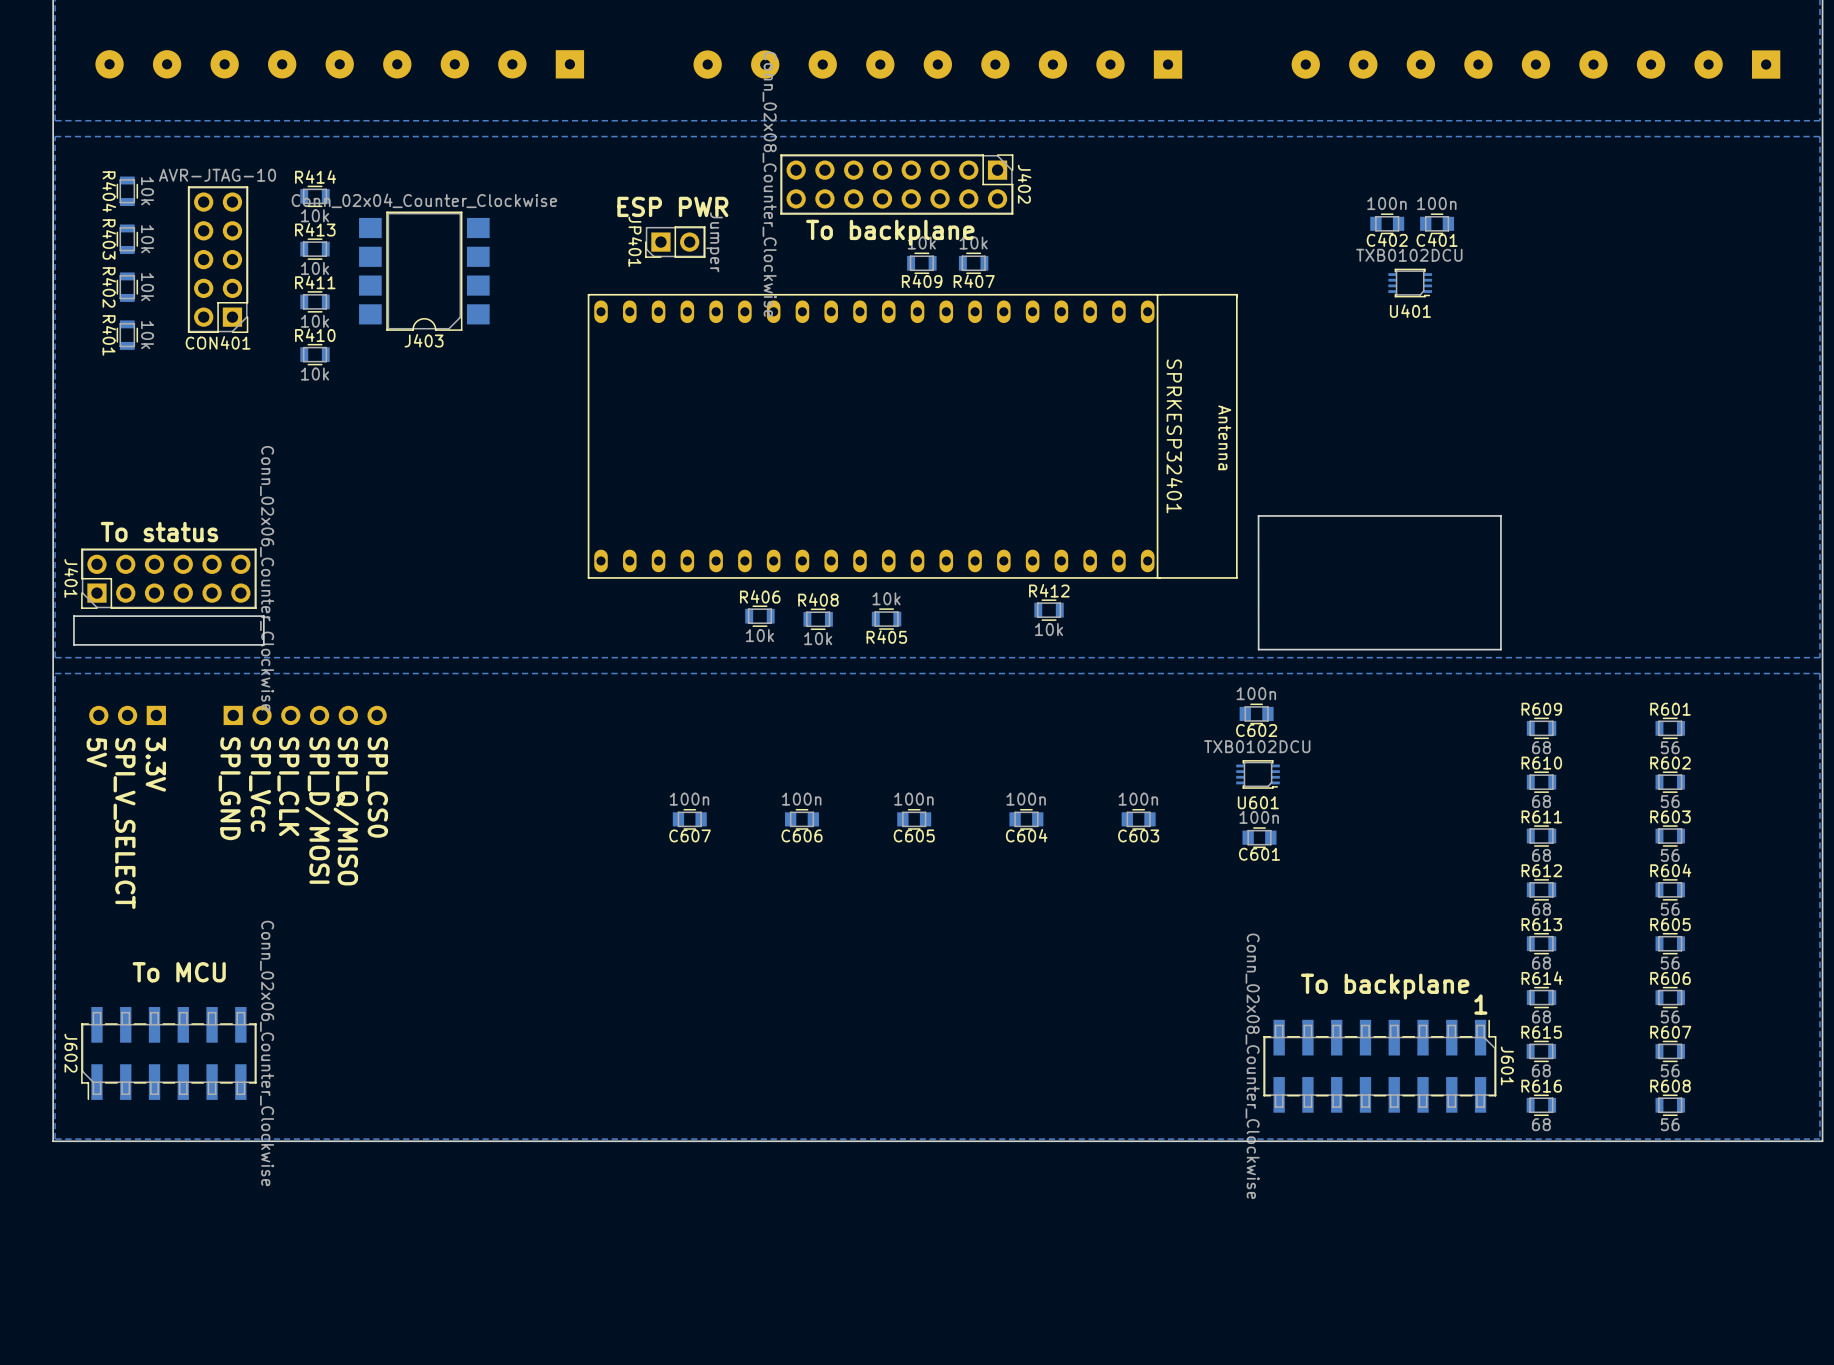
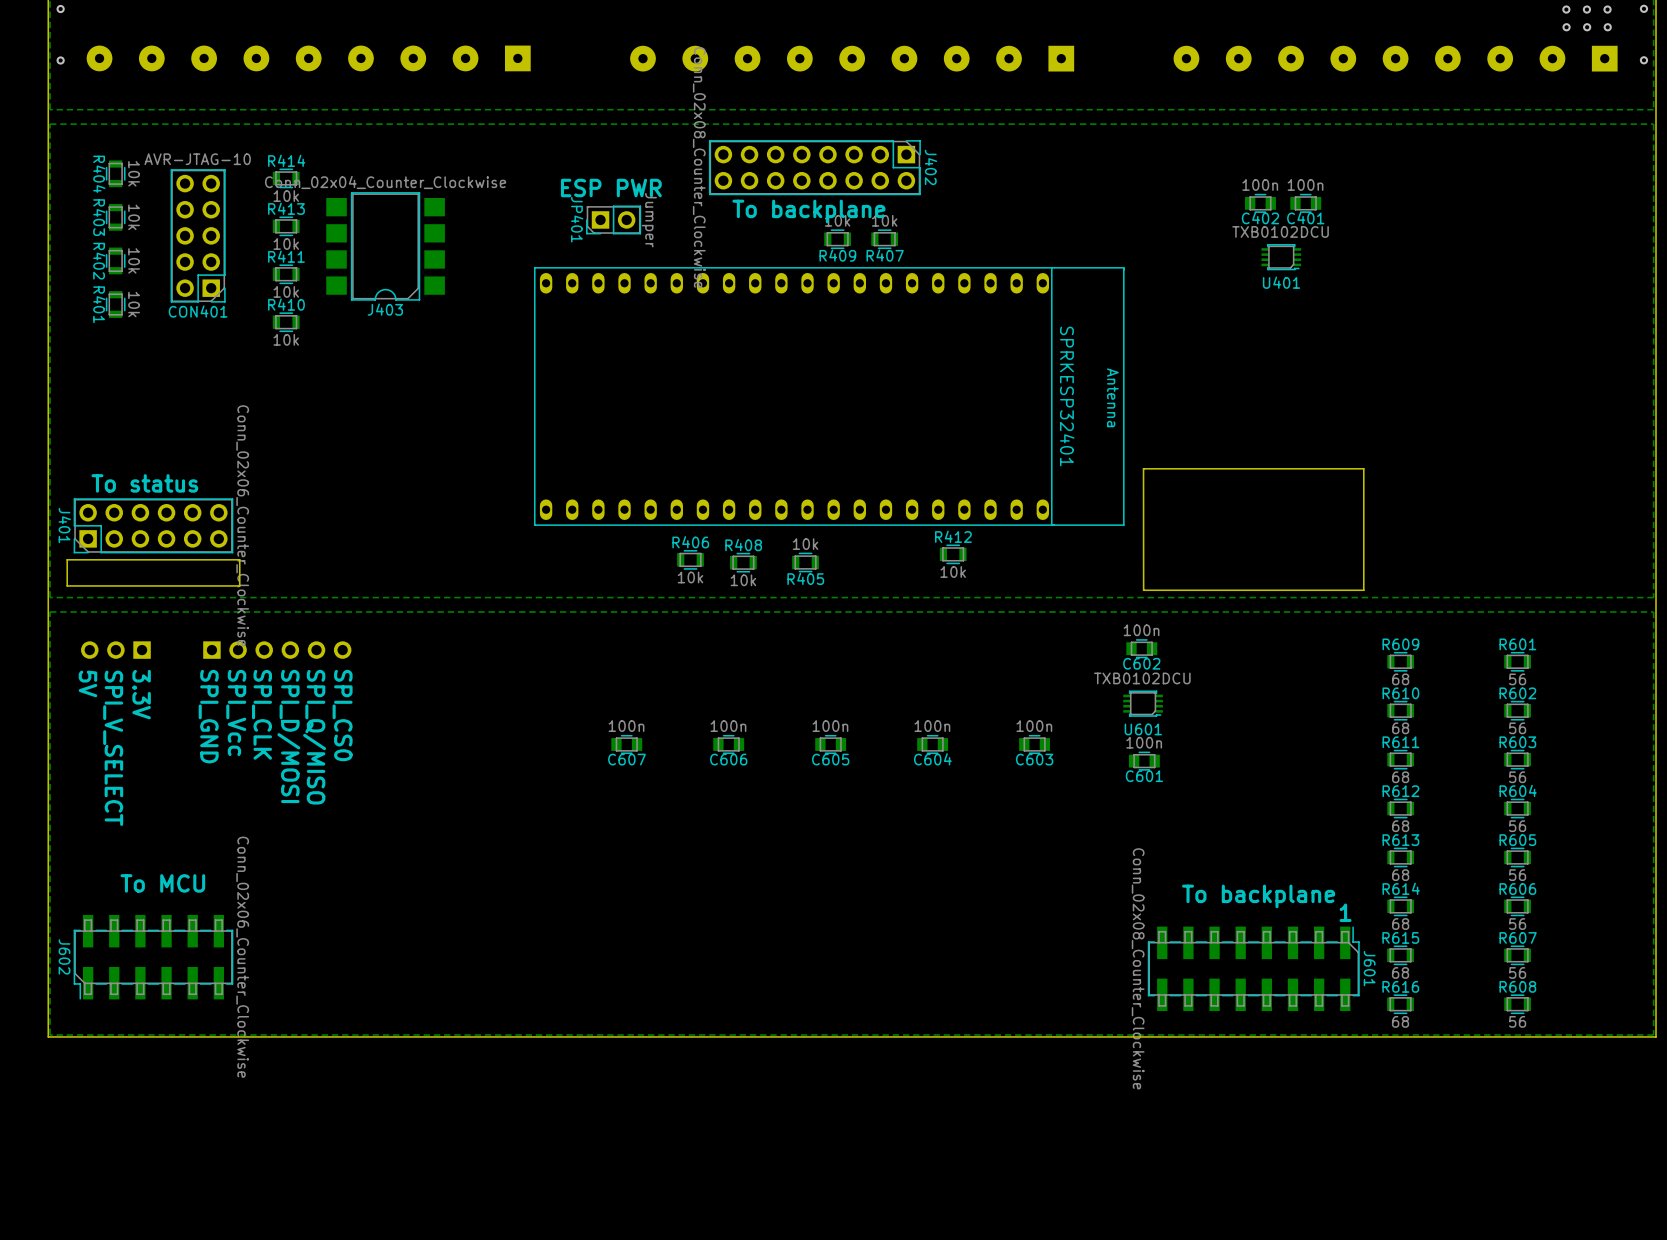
via: none -> (60, 9)
via: none -> (1643, 8)
via: none -> (1566, 9)
via: none -> (1586, 9)
via: none -> (1607, 9)
via: none -> (1566, 27)
via: none -> (1587, 27)
via: none -> (1607, 27)
via: none -> (60, 60)
via: none -> (1643, 60)

